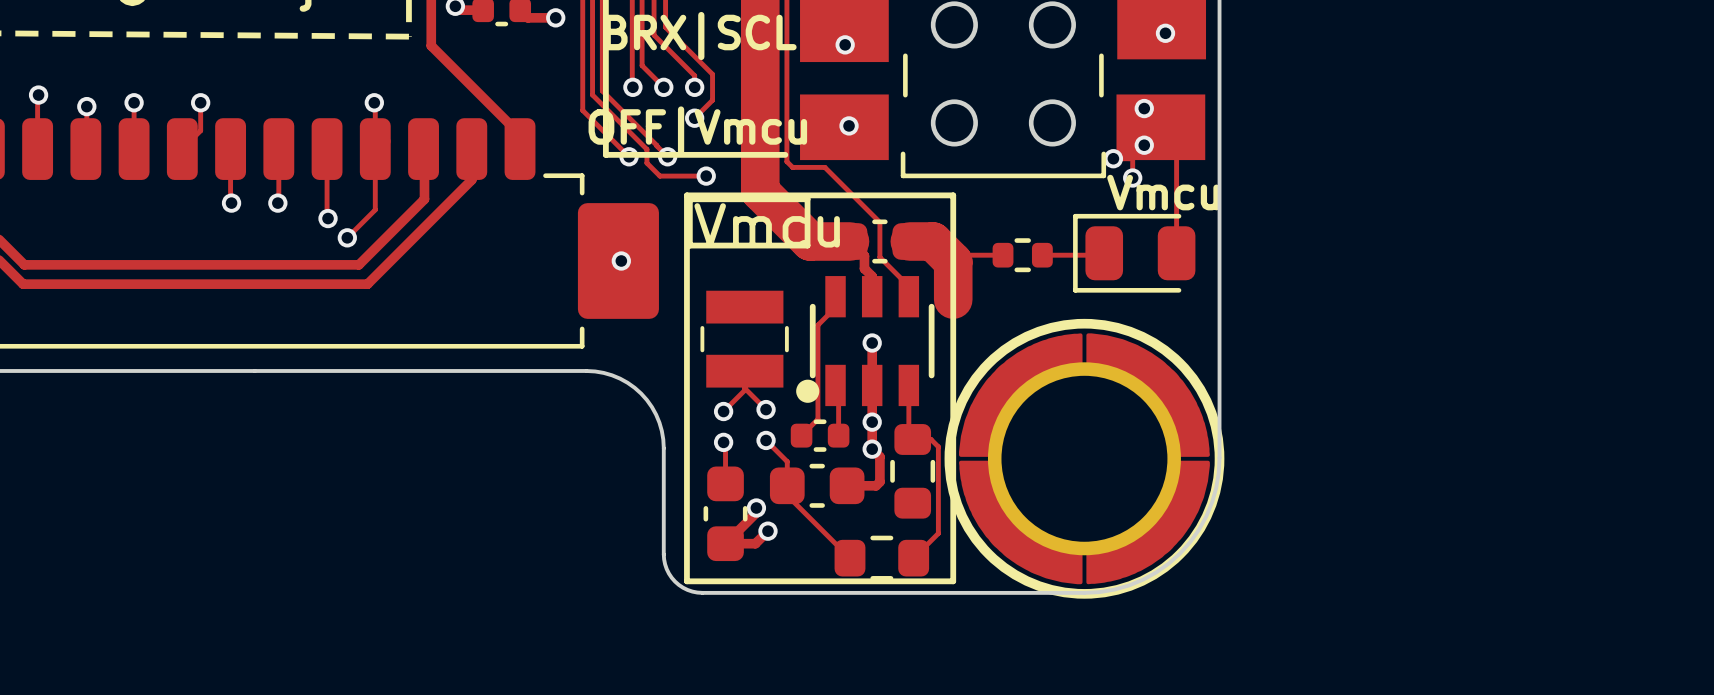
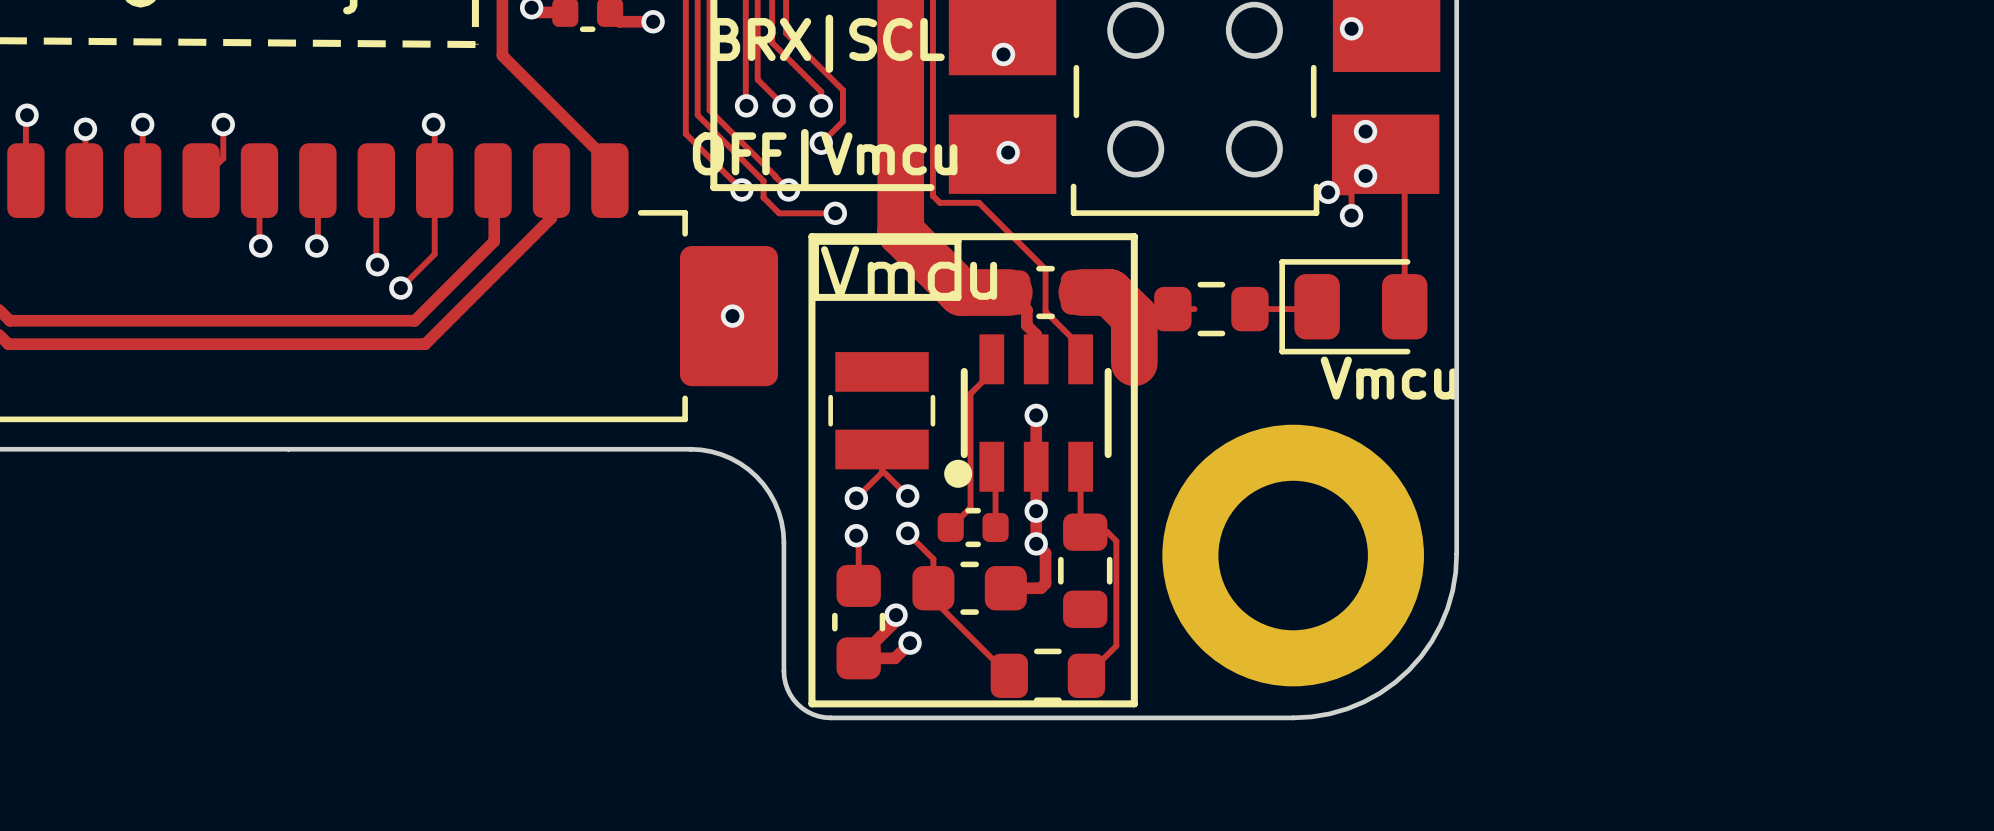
via position: (1165, 33) -> (1351, 28)
text position: Vmcu (1163, 192) -> Vmcu (1388, 378)
part footprint: [992, 238, 1053, 273] -> [1154, 281, 1269, 337]
part footprint: [944, 318, 1225, 599] -> [1162, 424, 1424, 687]

